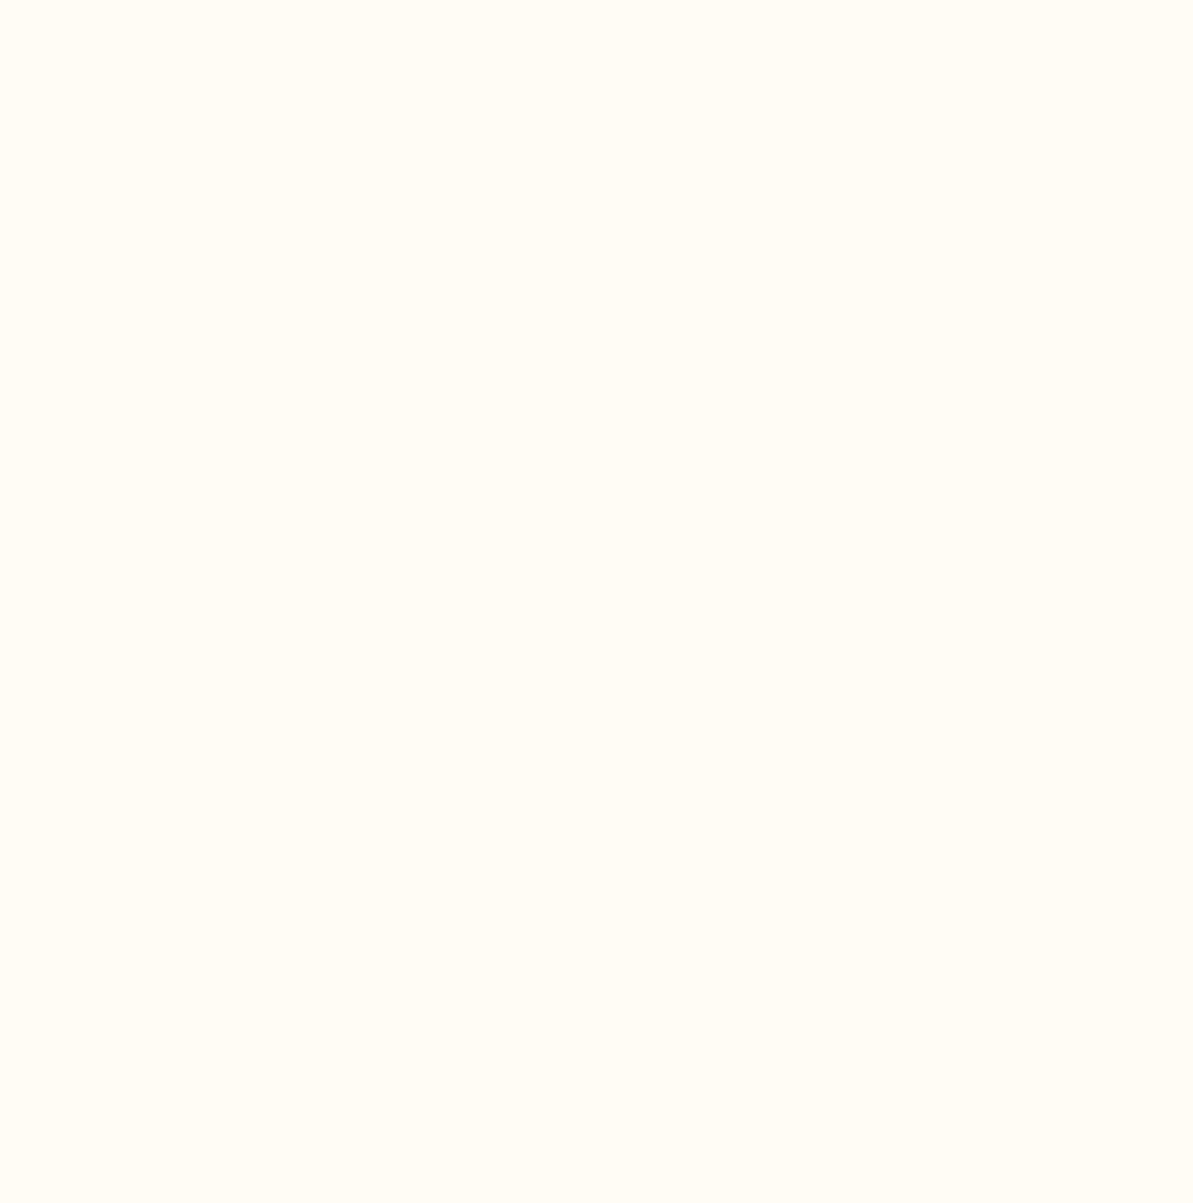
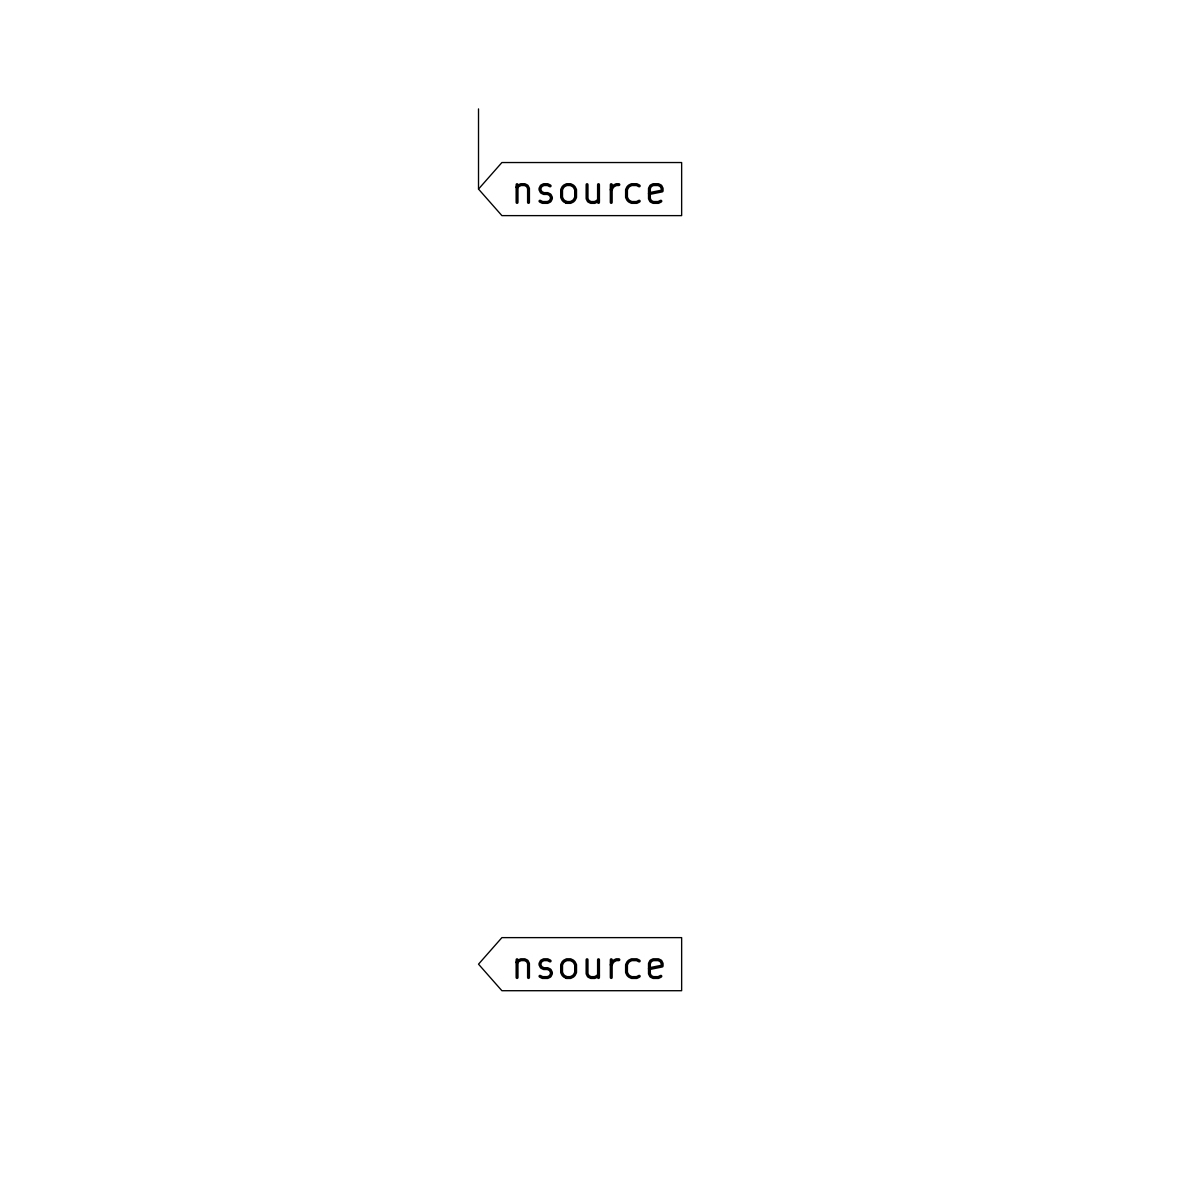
wire: none -> (478, 108) (478, 189)
global label: none -> nsource (589, 193)
global label: none -> nsource (589, 968)

